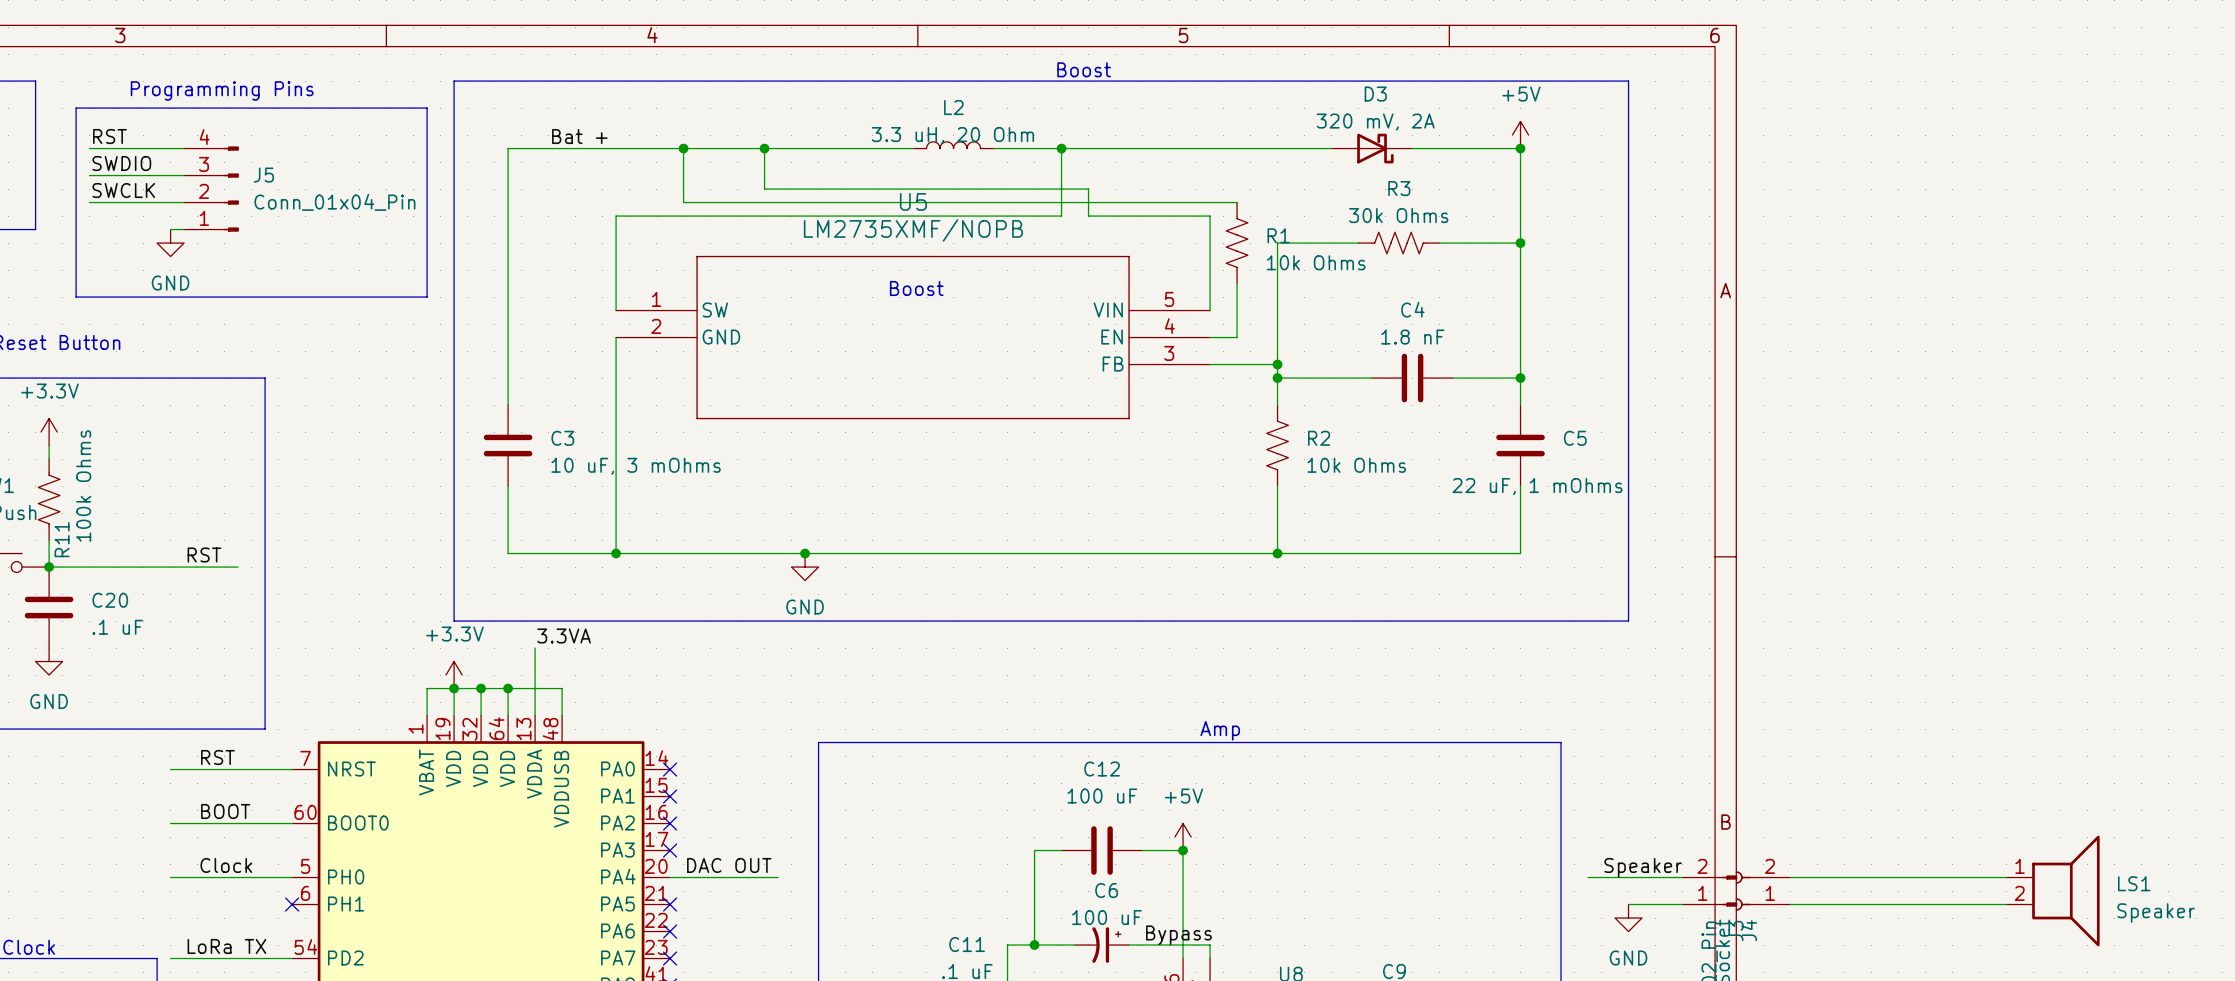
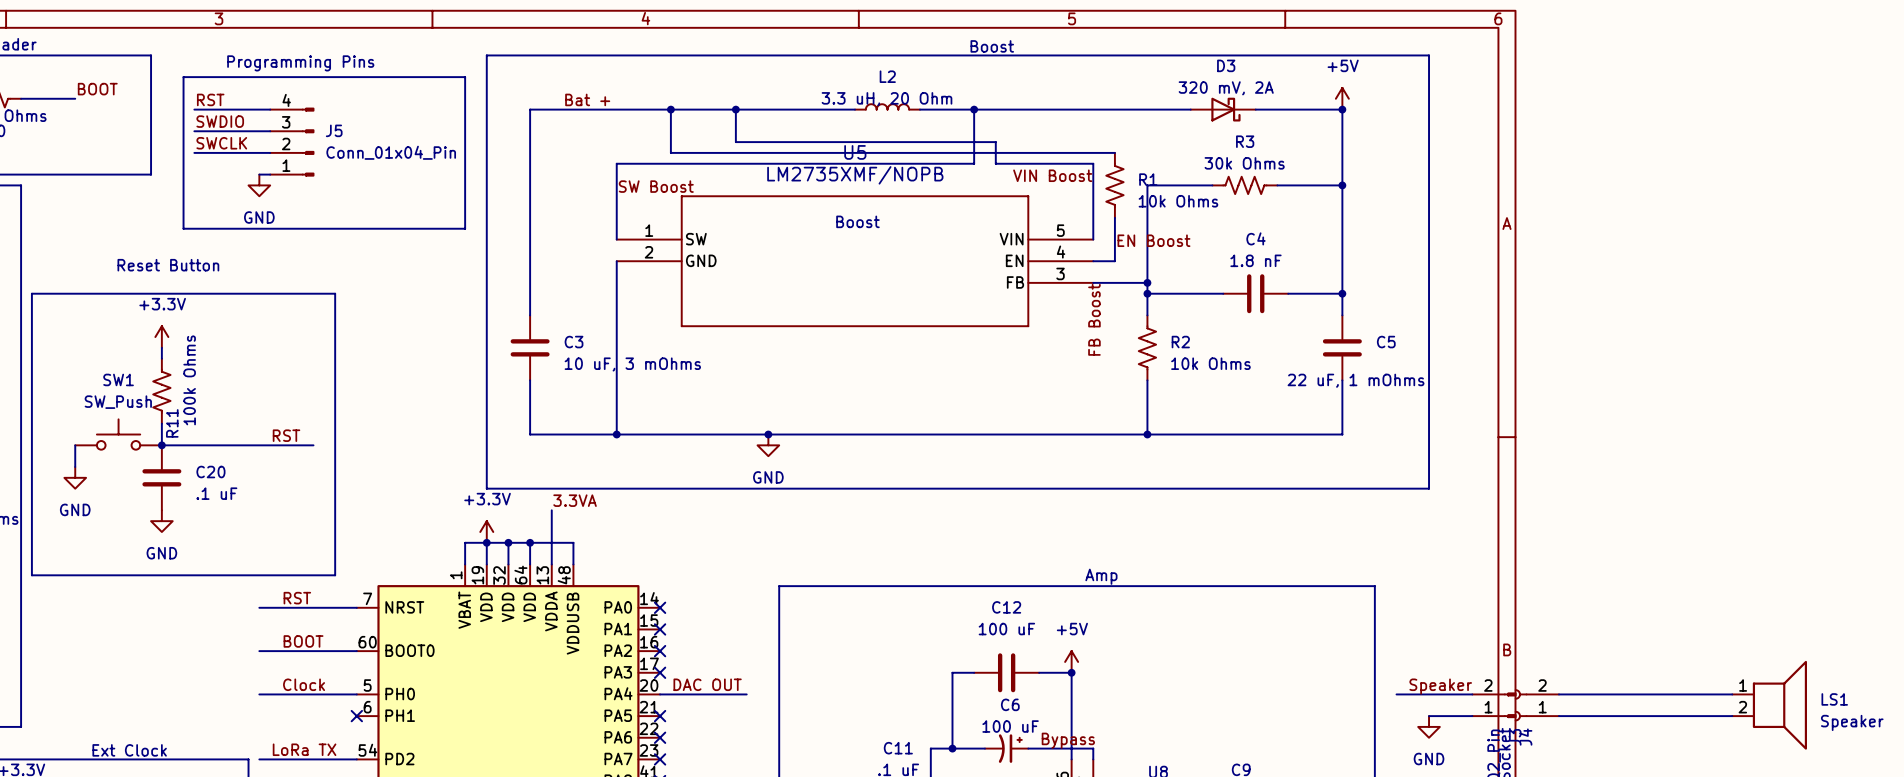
label: none -> VIN Boost (1052, 175)
label: none -> SW Boost (656, 186)
label: none -> EN Boost (1153, 240)
label: none -> FB Boost (1094, 319)

